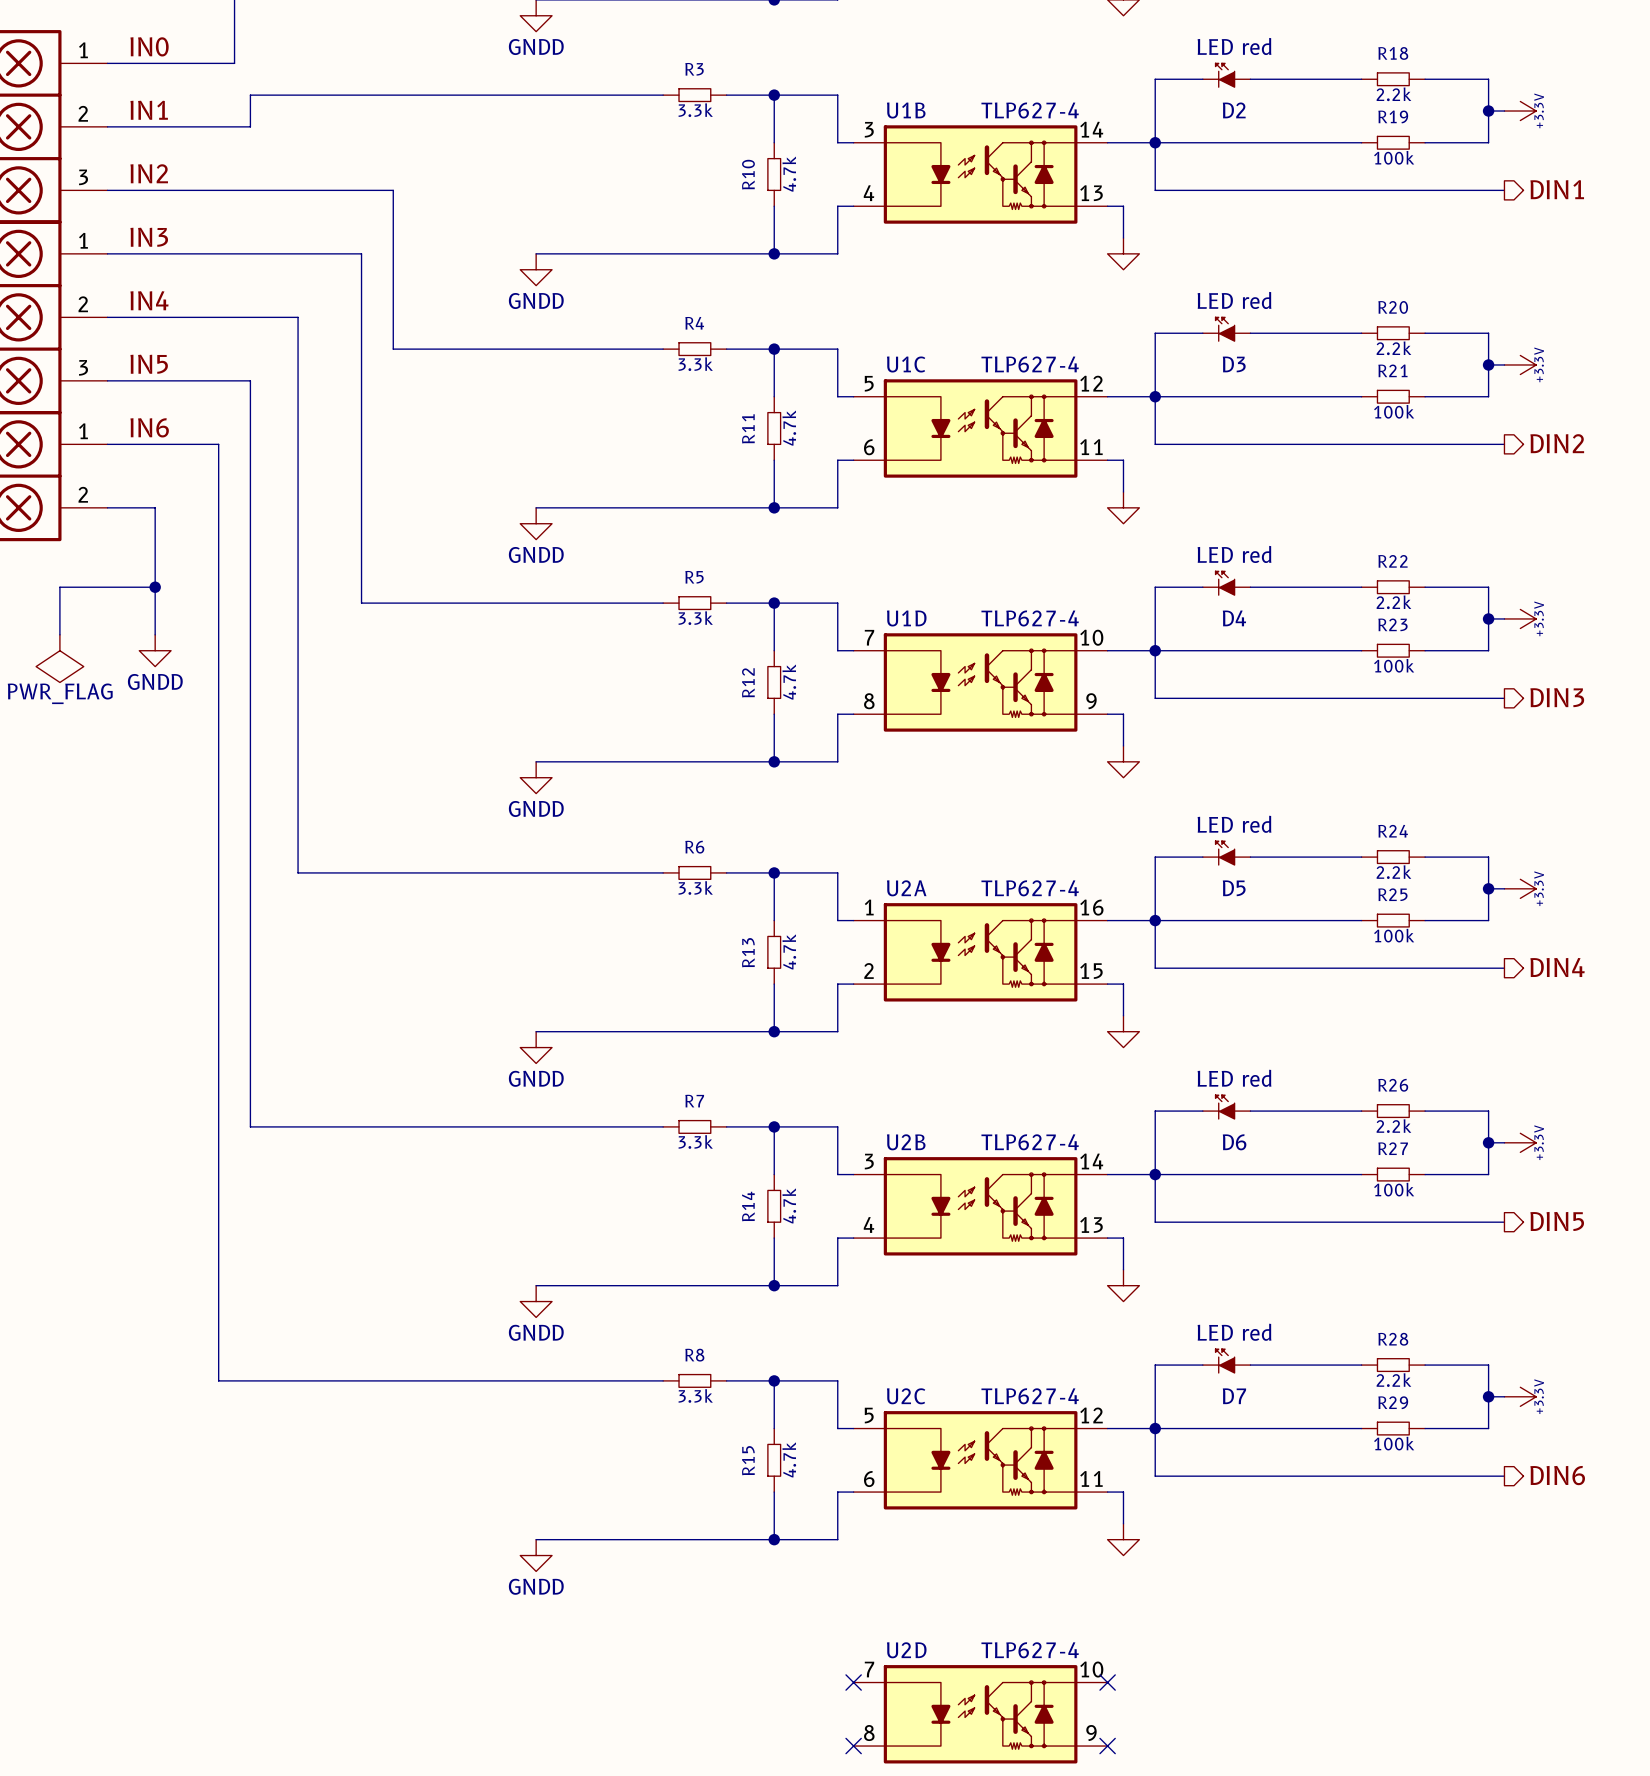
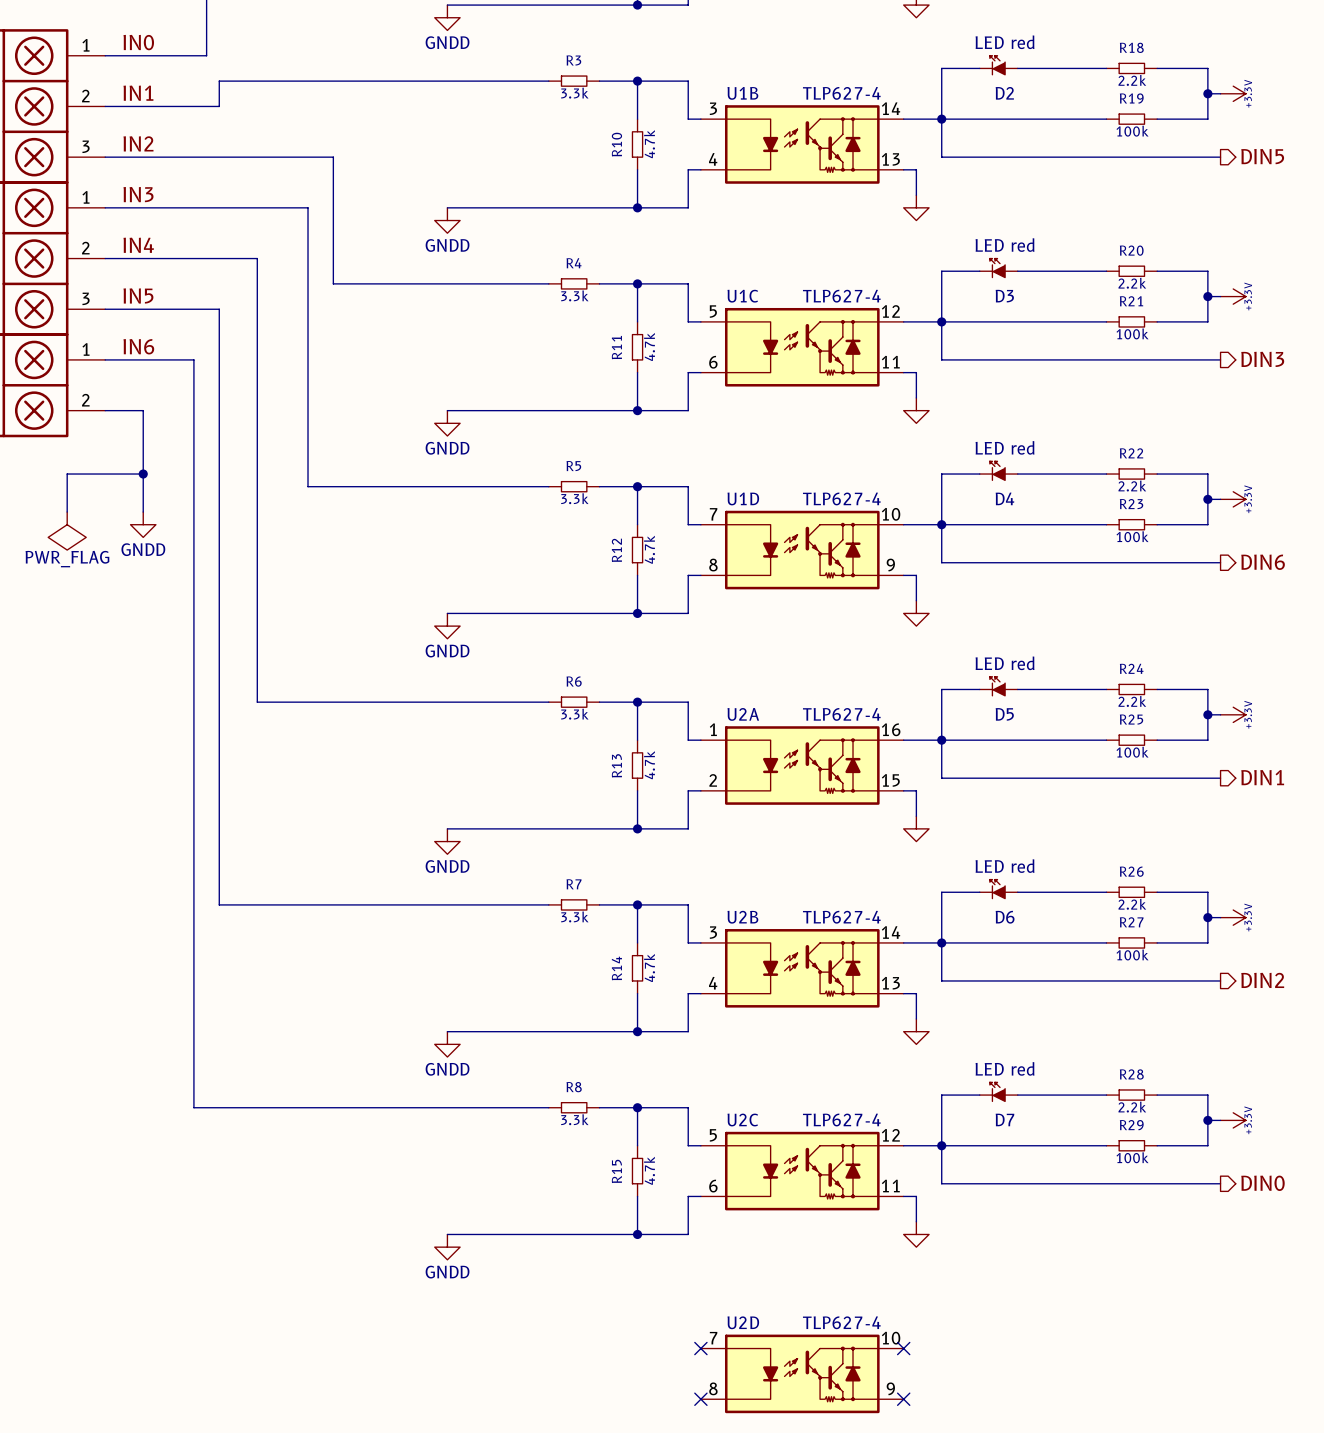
hierarchical label: DIN1 (1557, 189) -> DIN5 (1262, 156)
hierarchical label: DIN2 (1557, 443) -> DIN3 (1262, 359)
hierarchical label: DIN3 (1557, 697) -> DIN6 (1263, 562)
hierarchical label: DIN4 (1557, 967) -> DIN1 (1262, 777)
hierarchical label: DIN5 (1557, 1221) -> DIN2 (1262, 980)
hierarchical label: DIN6 (1557, 1475) -> DIN0 (1262, 1183)

